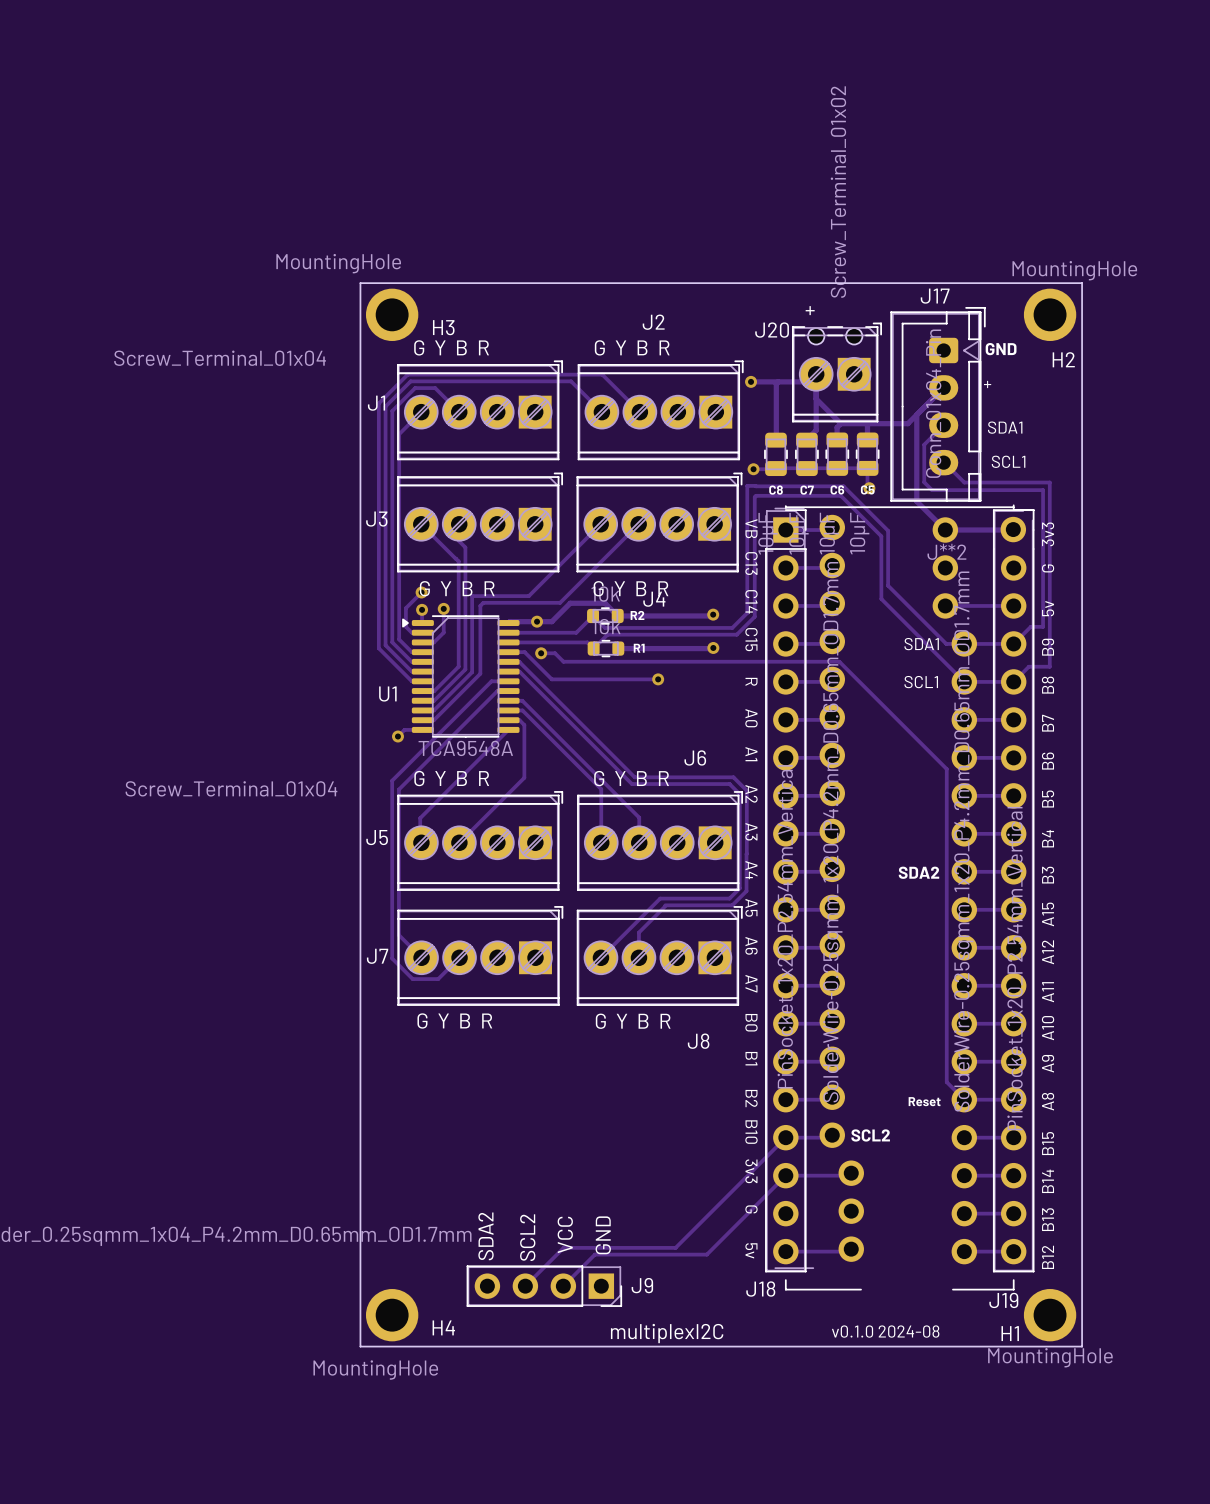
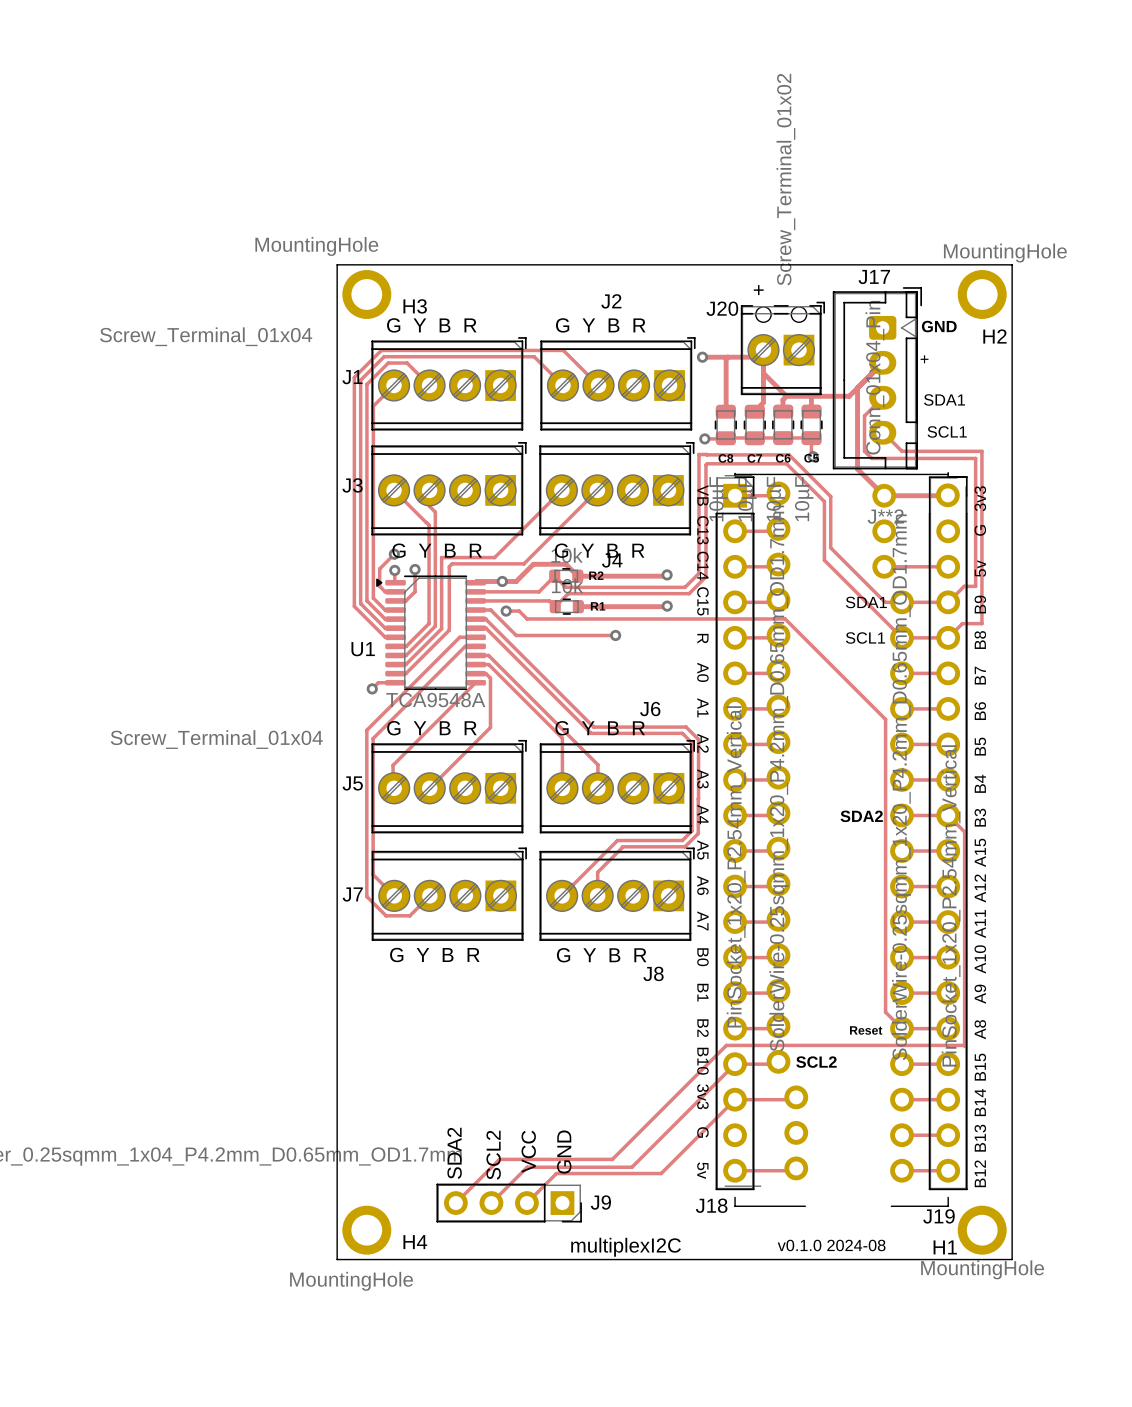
track: none -> (948, 815) (964, 831) (964, 1045) (726, 1045) (612, 1159) (499, 1159) (455, 1203)

